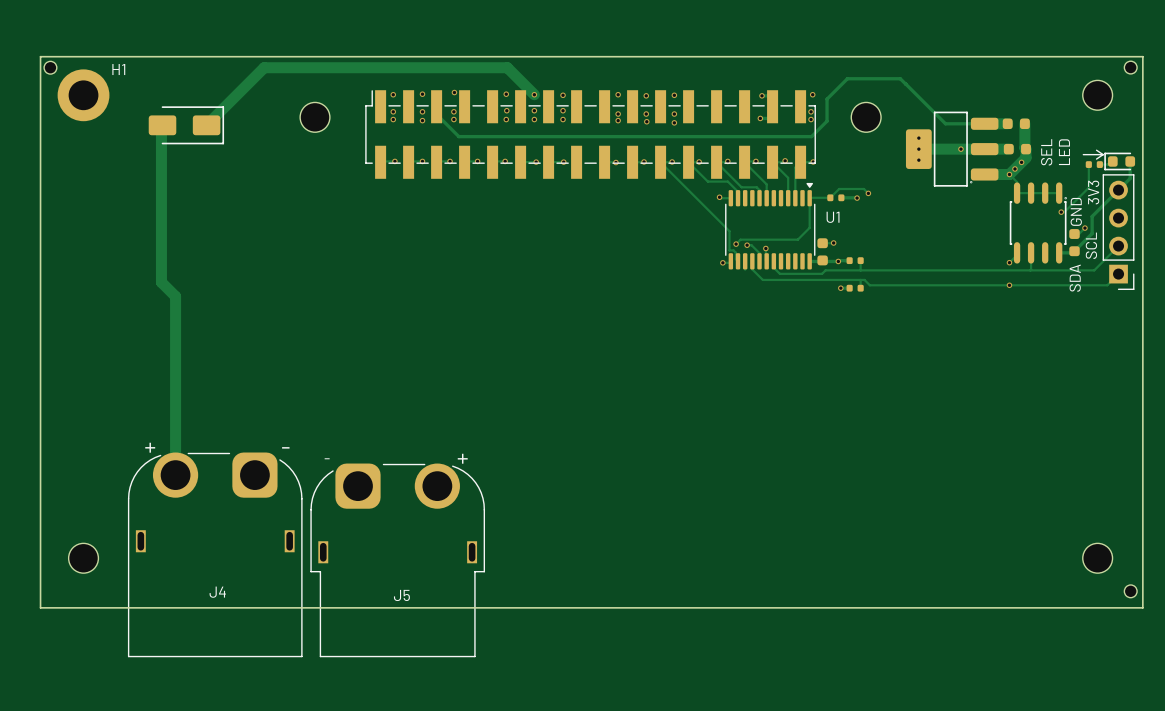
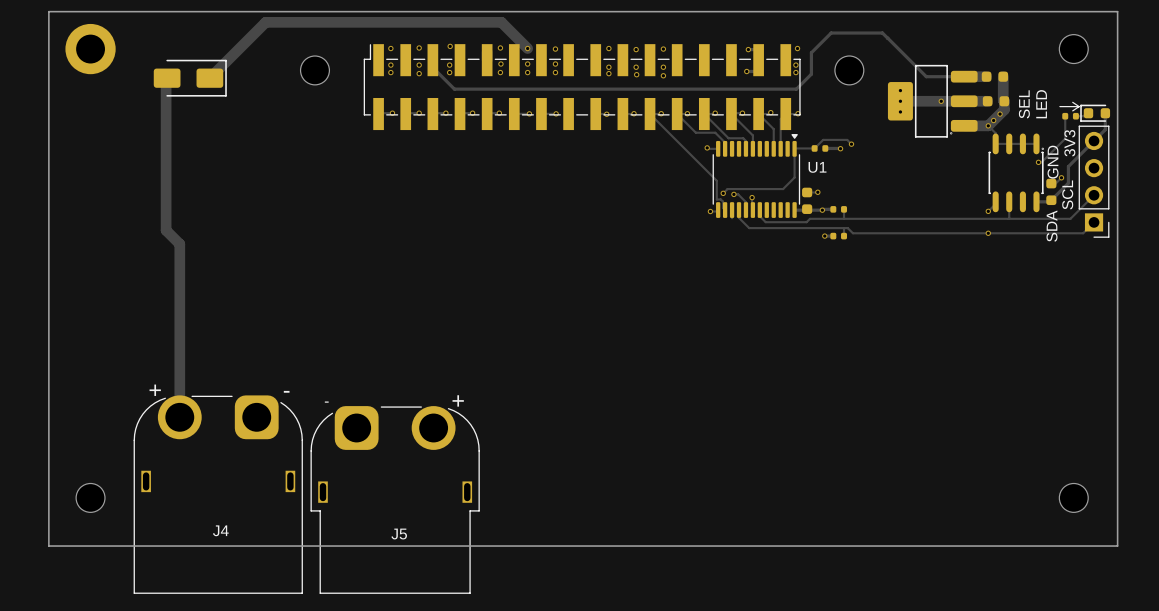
part: (50, 67) -> none
part: (1130, 67) -> none
H1 name: H1 (118, 69) -> none
part: (1130, 591) -> none

